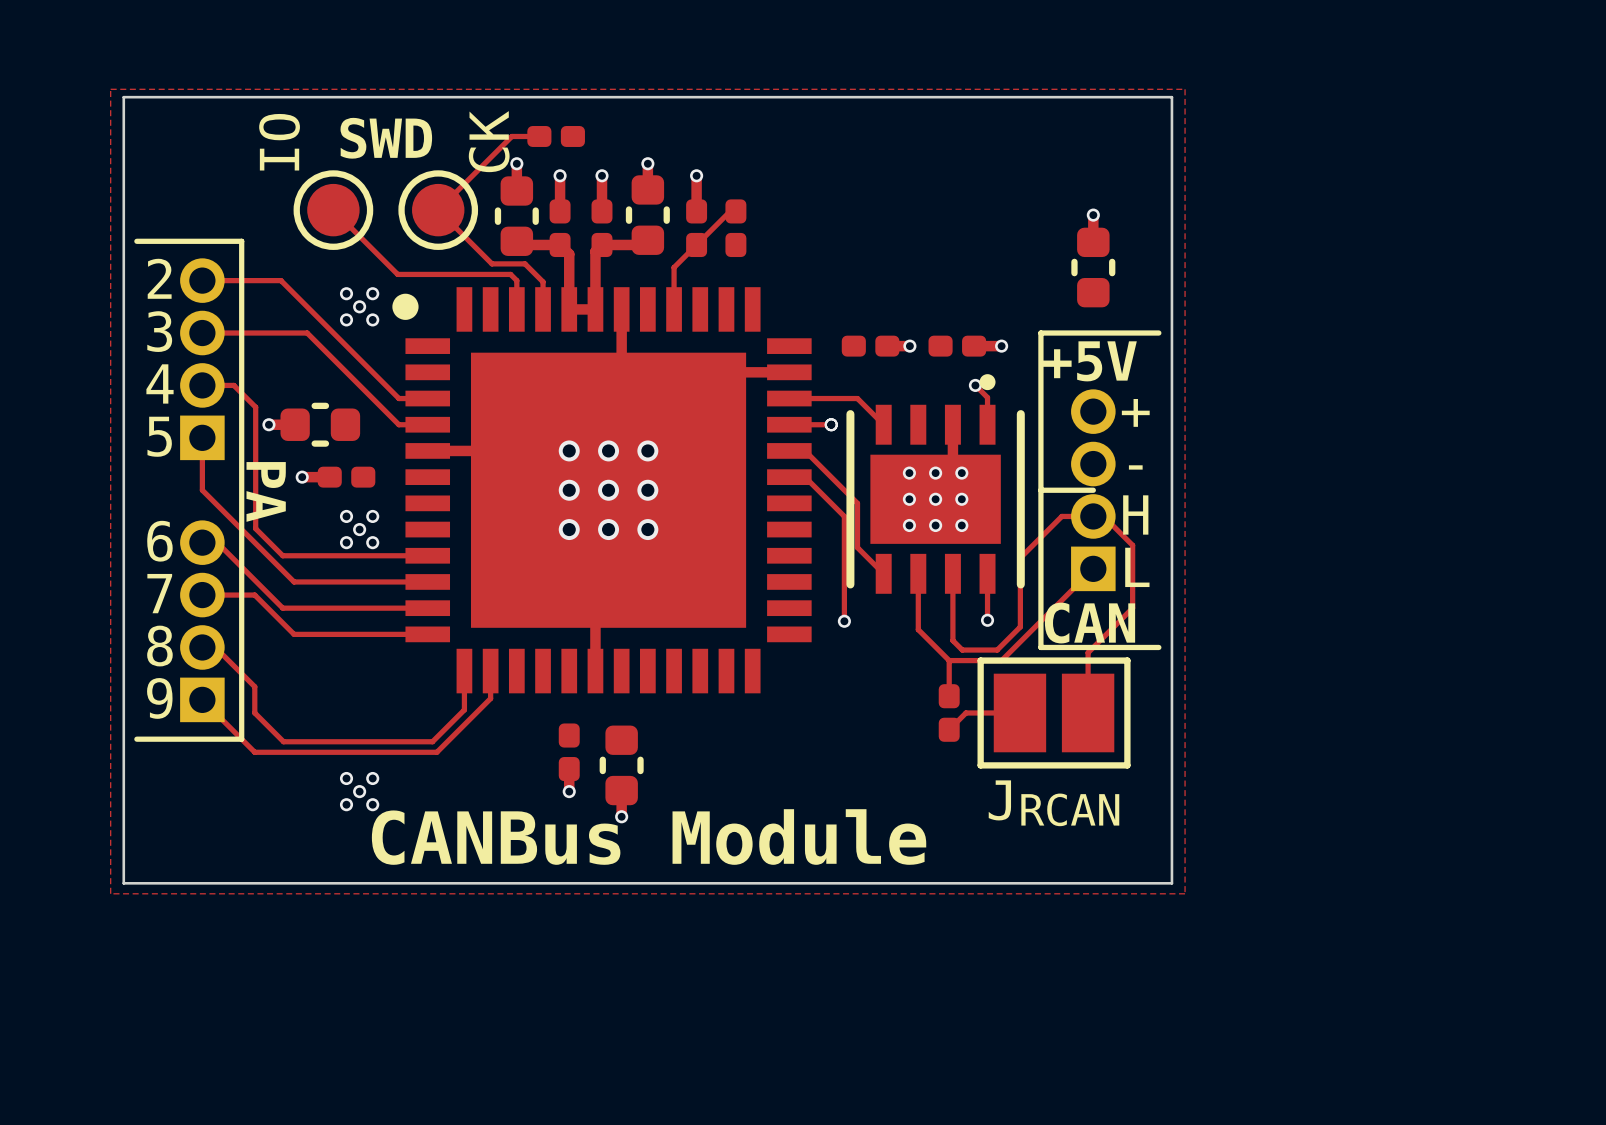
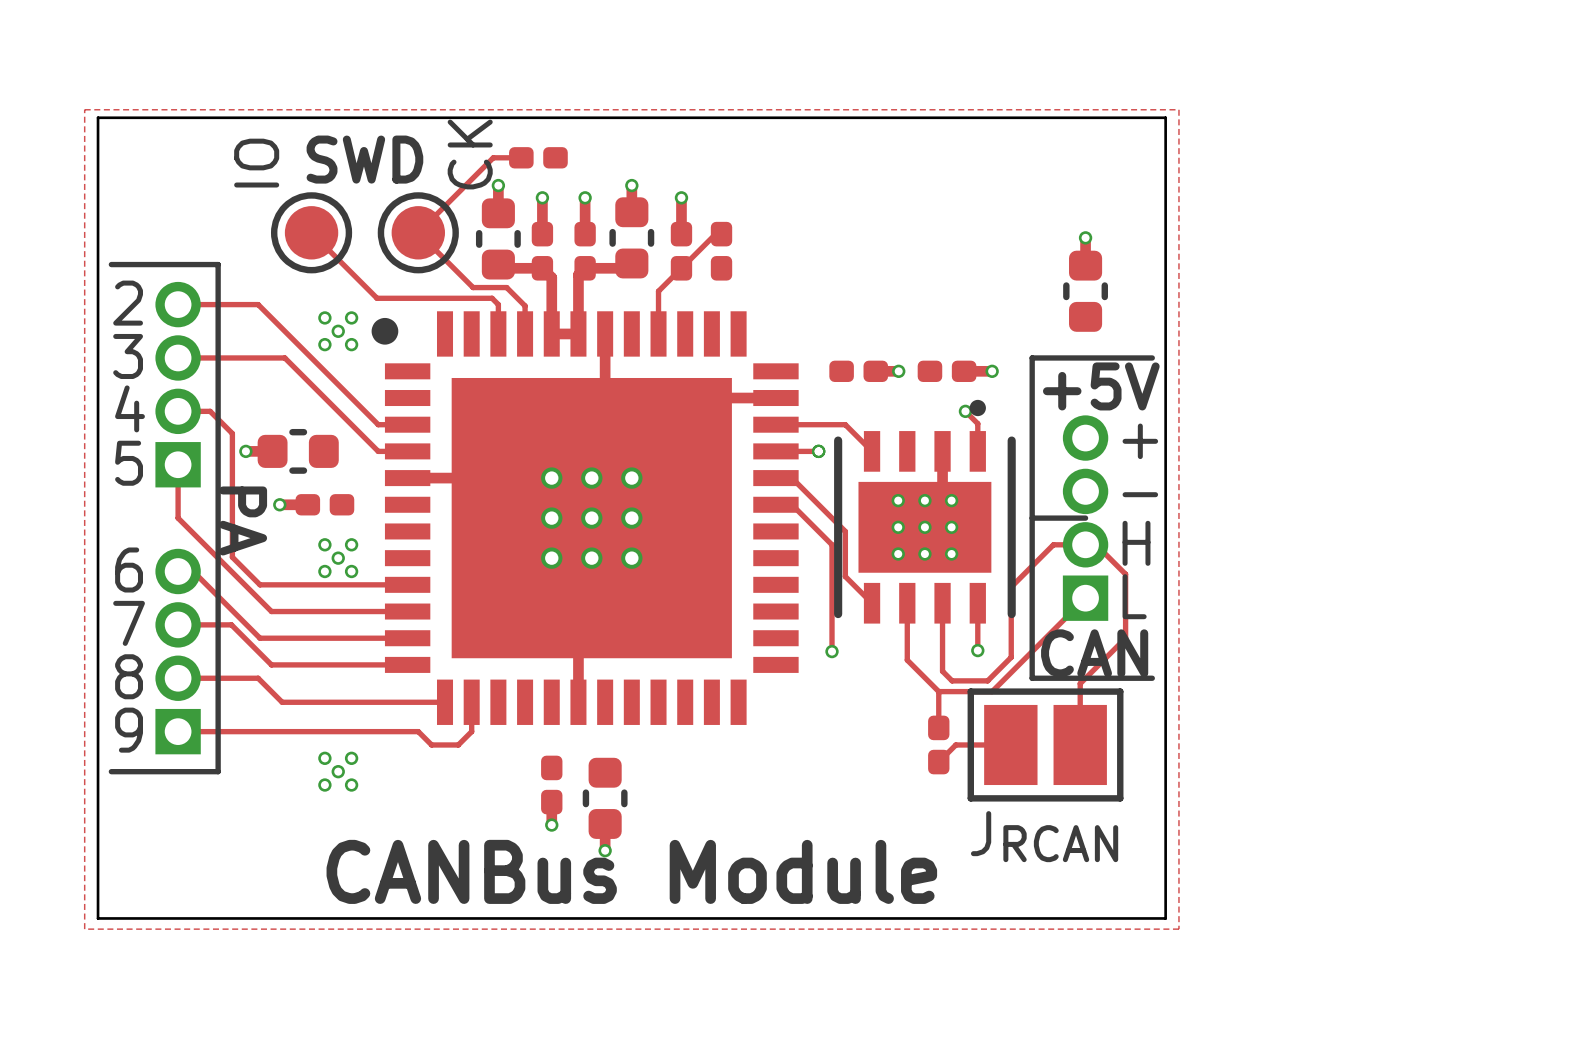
track: (215, 647) (254, 686) (254, 712) (283, 741) (432, 741) (464, 709) (464, 671) -> (191, 678) (258, 678) (282, 702) (445, 702)
track: (490, 698) (436, 752) (254, 752) (202, 699) -> (471, 730) (458, 744) (431, 744) (418, 731) (178, 731)
via: none -> (324, 758)
via: none -> (351, 758)
via: none -> (338, 771)
via: none -> (324, 785)
via: none -> (351, 785)
via: (346, 778) -> none
via: (372, 778) -> none
via: (359, 791) -> none
via: (346, 804) -> none
via: (372, 804) -> none

